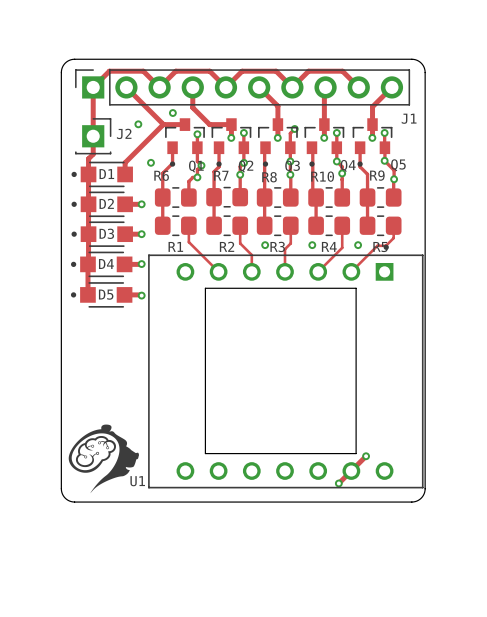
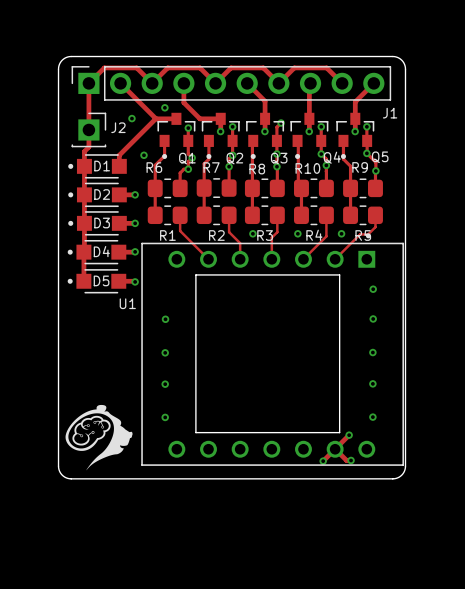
via: none -> (373, 289)
via: none -> (165, 319)
via: none -> (373, 318)
via: none -> (165, 352)
via: none -> (372, 352)
via: none -> (165, 384)
via: none -> (372, 383)
via: none -> (165, 417)
via: none -> (372, 417)
track: none -> (335, 449) (346, 460) (351, 460)
U1 name position: U1 (137, 481) -> U1 (127, 303)
via: none -> (351, 460)

